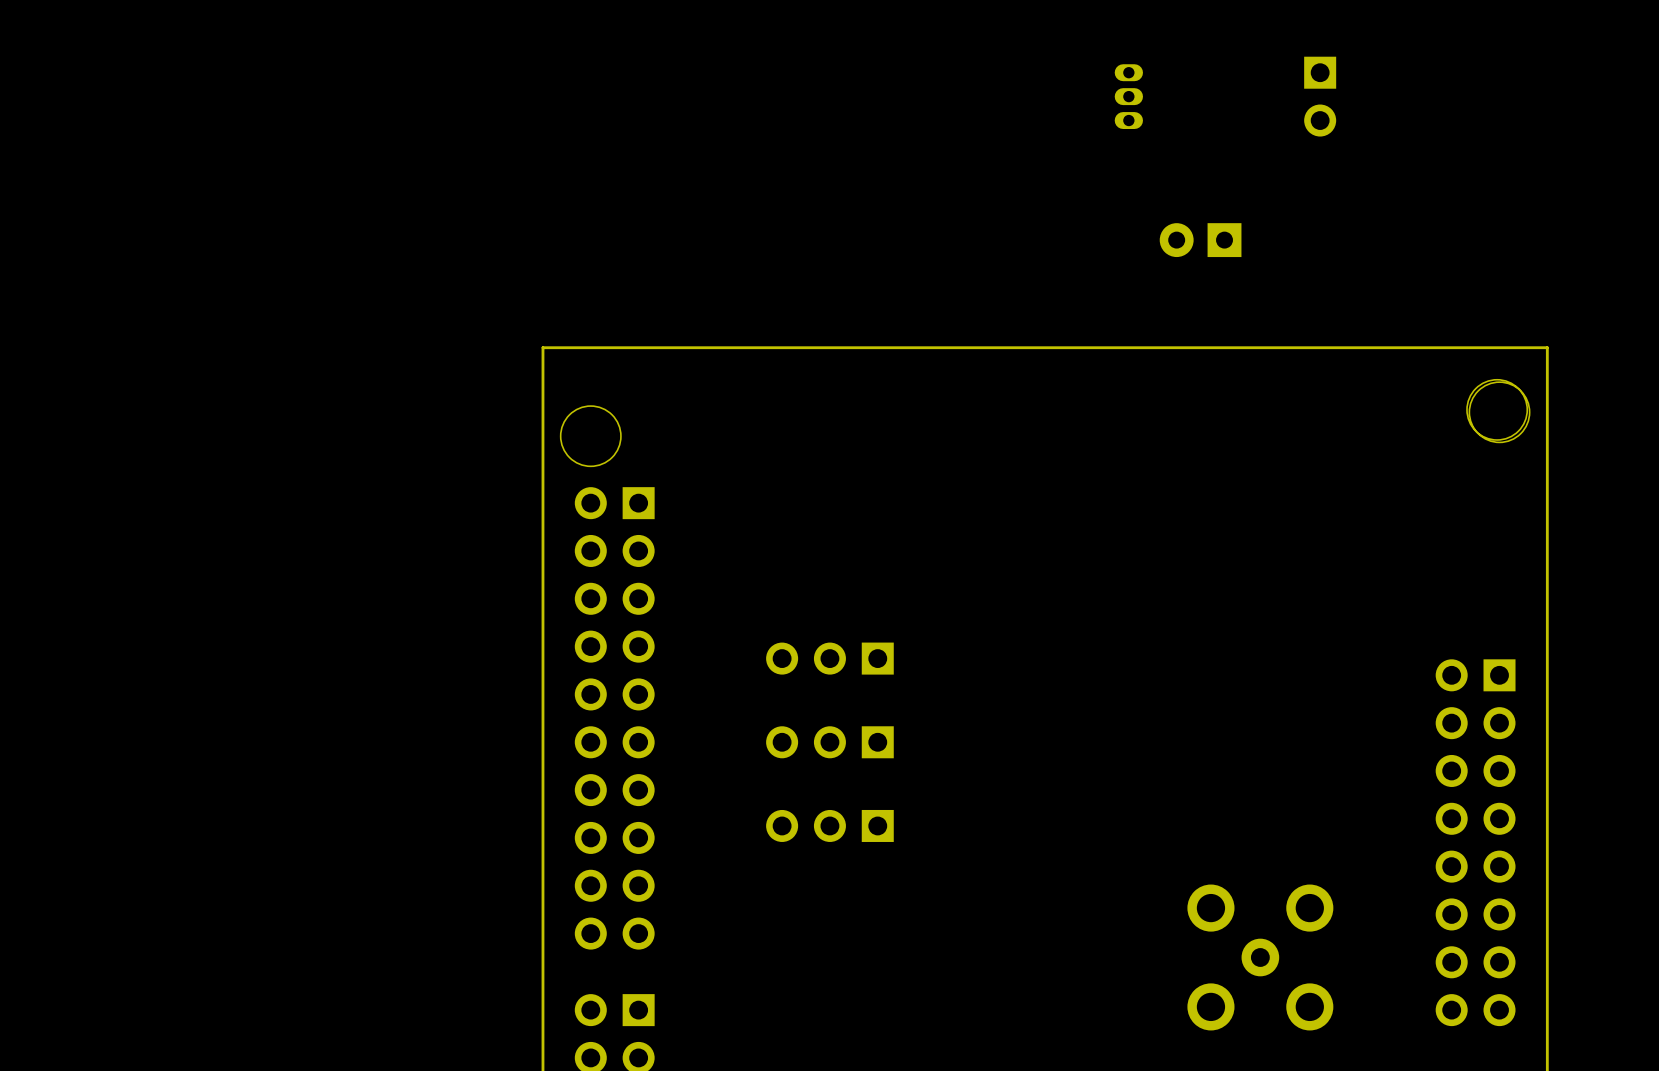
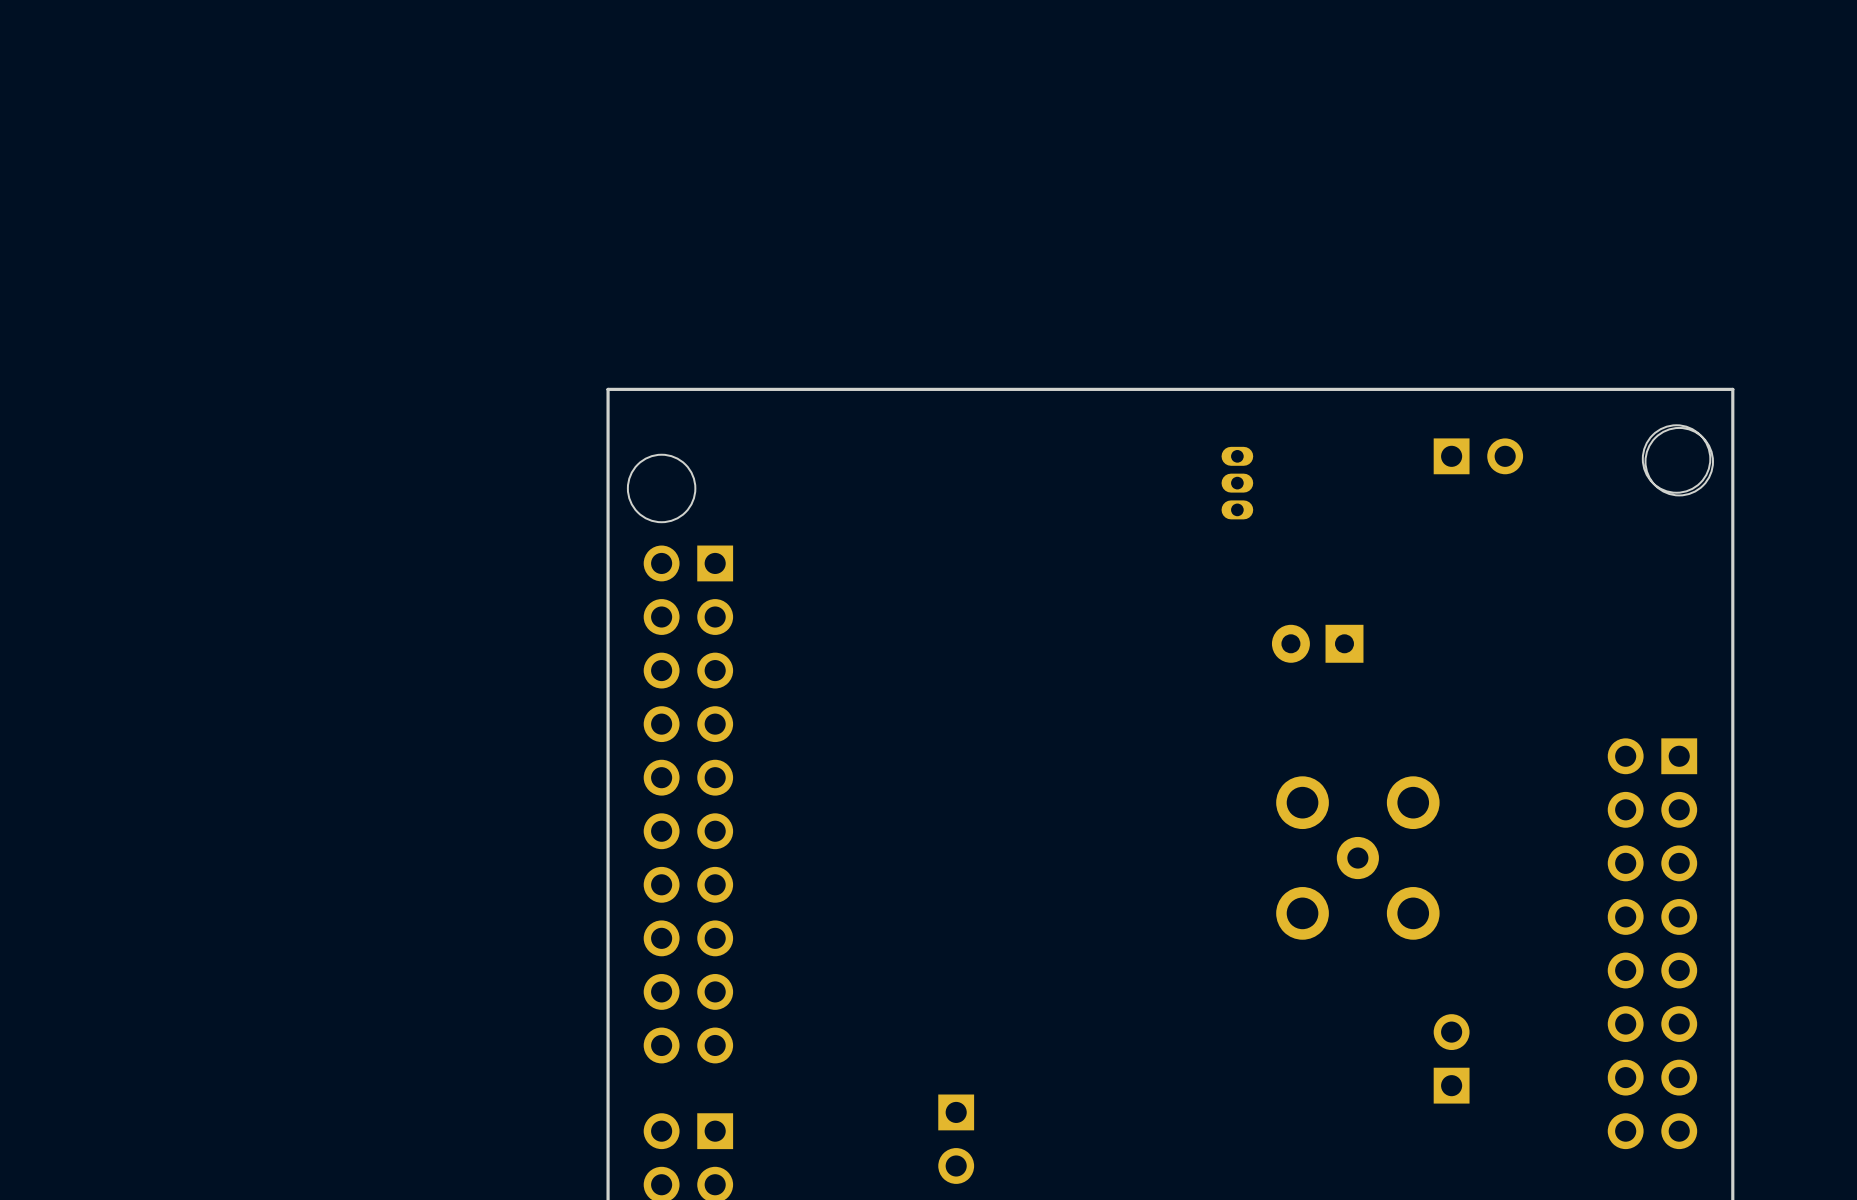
part position: (1128, 96) -> (1237, 483)
part rotation: 0° (1320, 96) -> 90° counterclockwise (1478, 456)
part position: (1320, 96) -> (1478, 456)
part position: (1200, 240) -> (1317, 643)
part: (829, 658) -> none
part: (829, 742) -> none
part: (829, 825) -> none
part: none -> (1451, 1058)
part position: (1260, 957) -> (1357, 858)
part: none -> (956, 1139)

